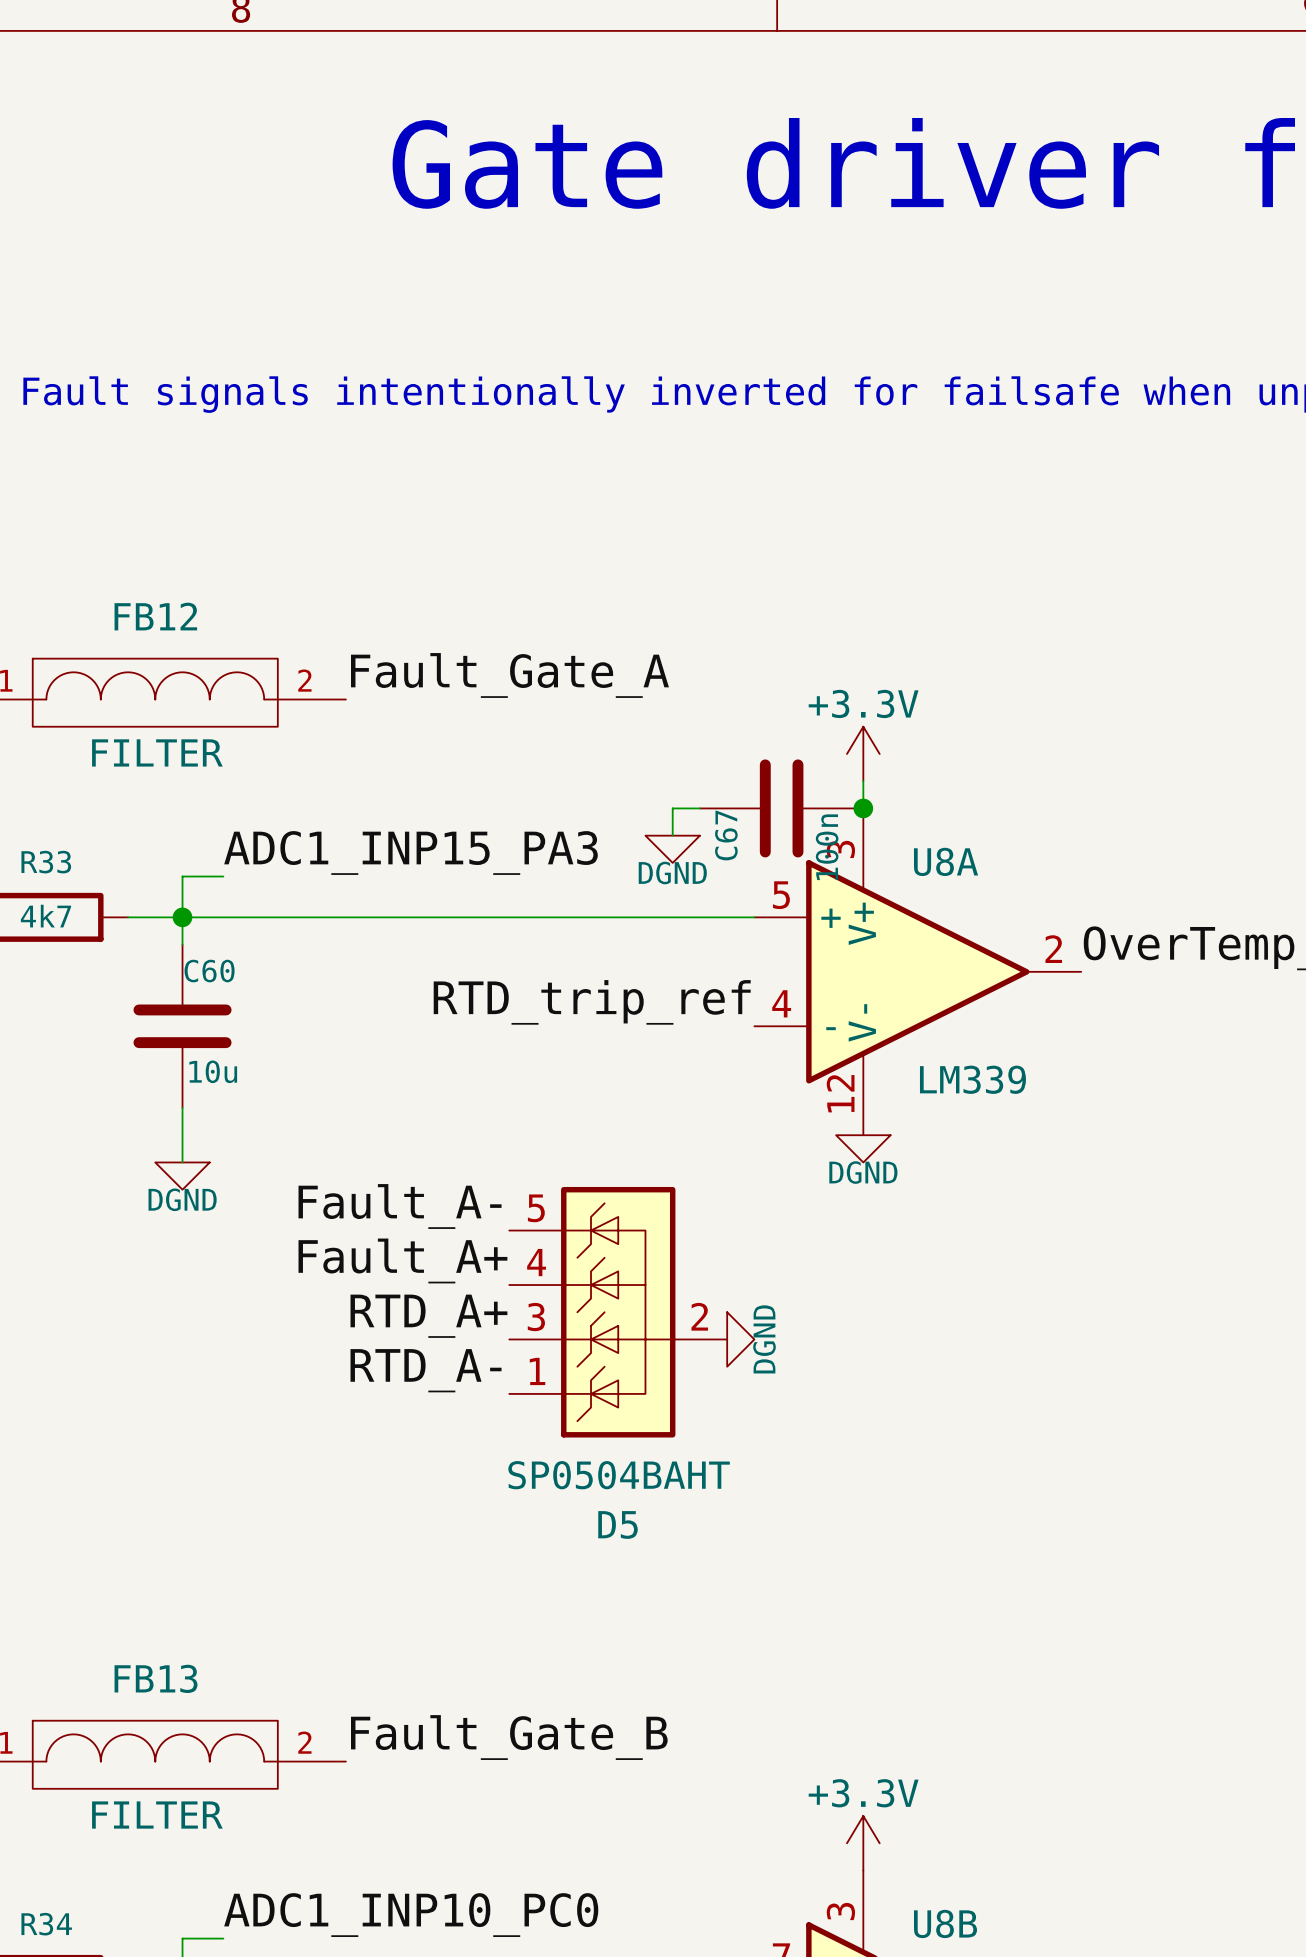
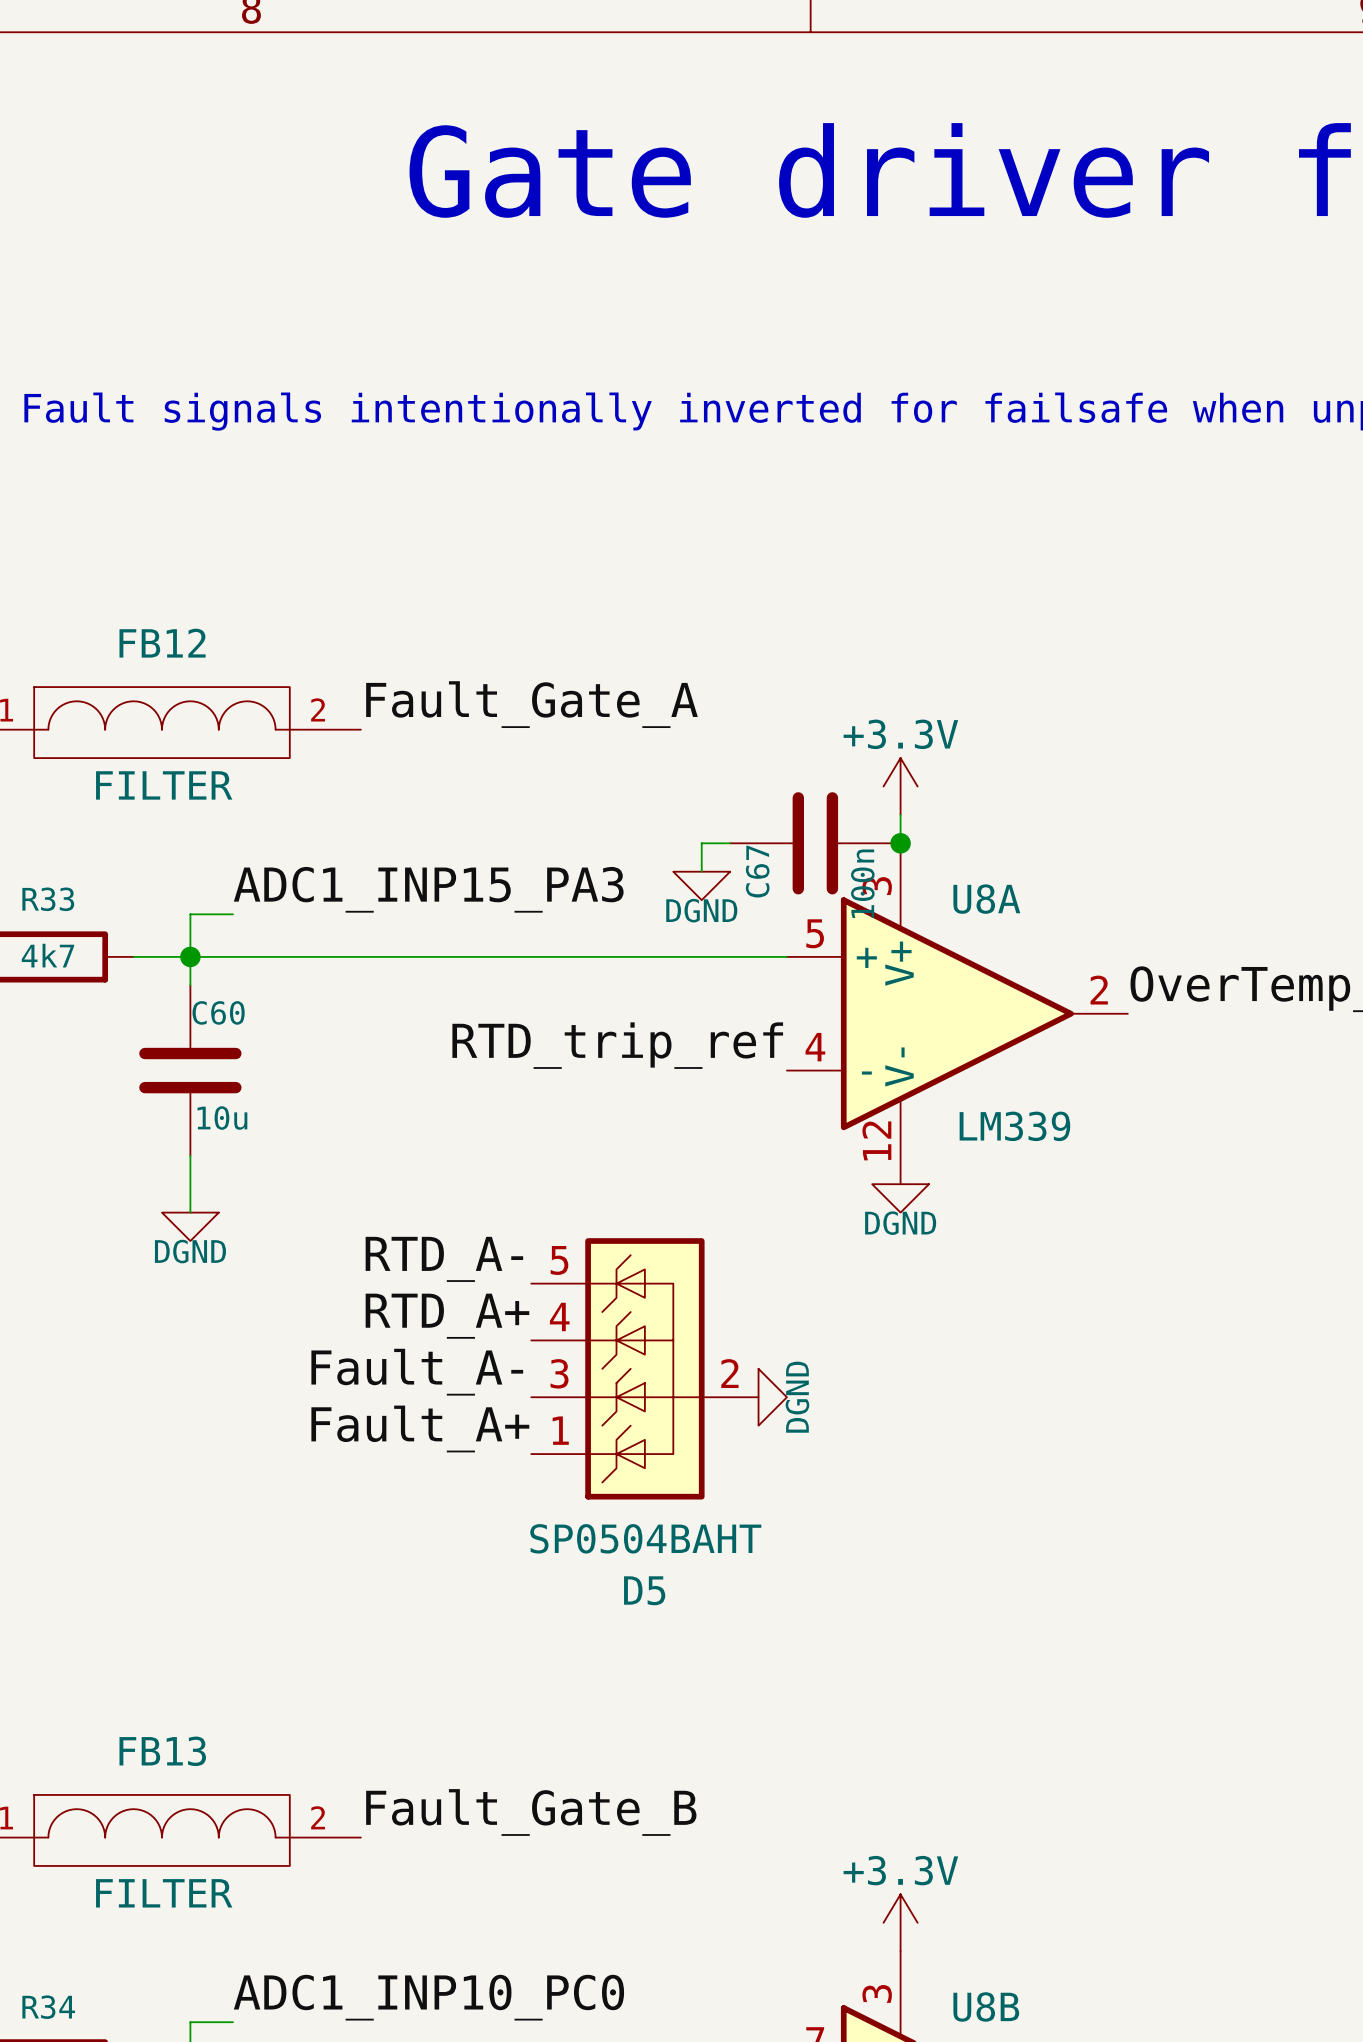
label: Fault_A- (400, 1206) -> RTD_A- (444, 1259)
label: Fault_A+ (402, 1260) -> RTD_A+ (447, 1316)
label: RTD_A+ (428, 1316) -> Fault_A- (417, 1372)
label: RTD_A- (426, 1370) -> Fault_A+ (420, 1428)

